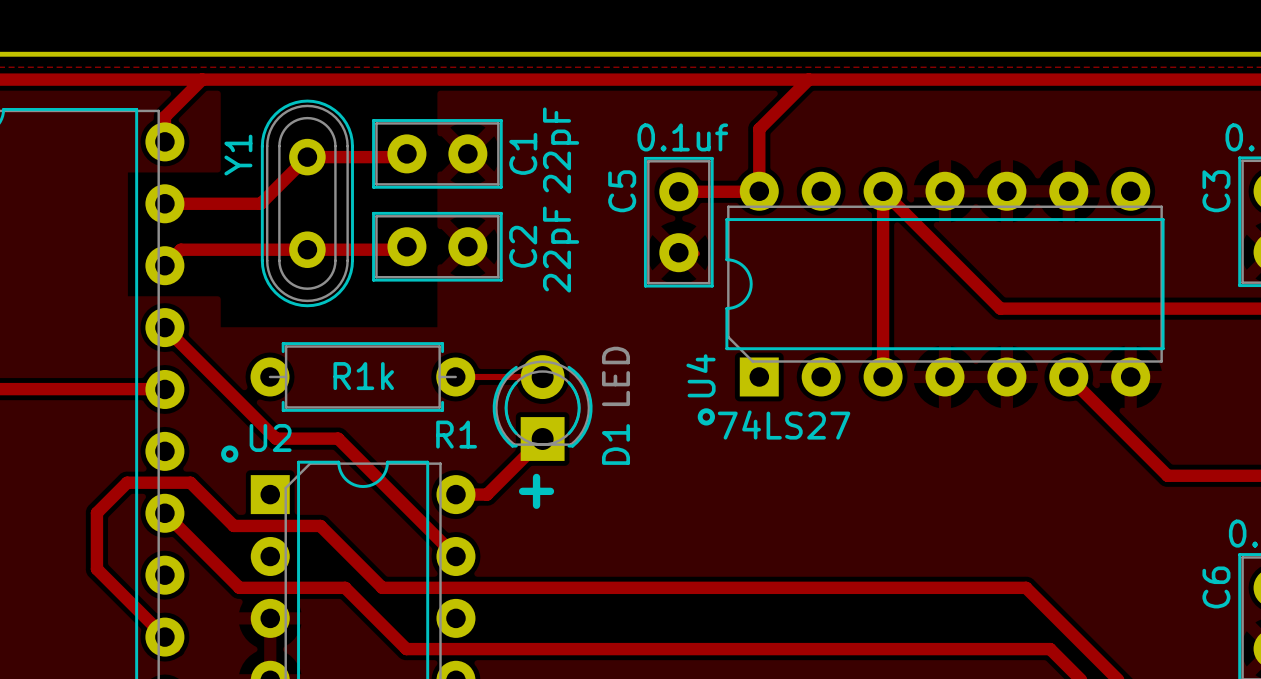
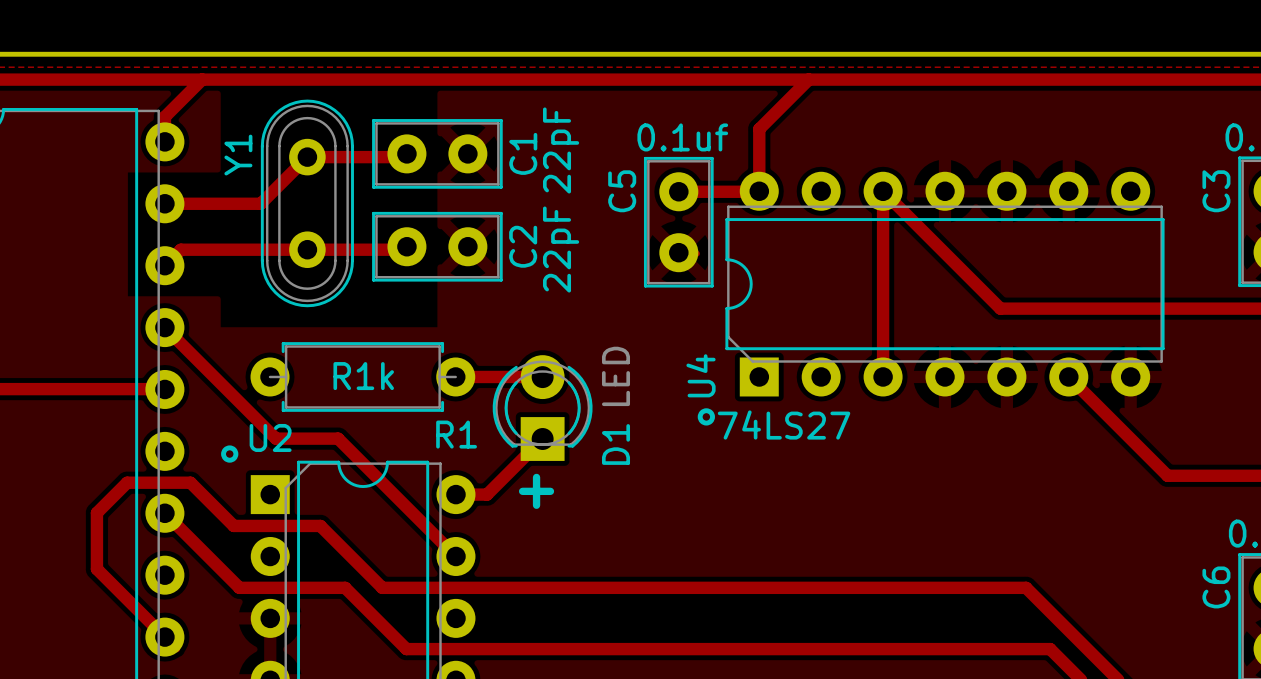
track width: thin (455, 376) (542, 376) -> thick (455, 376) (542, 376)

